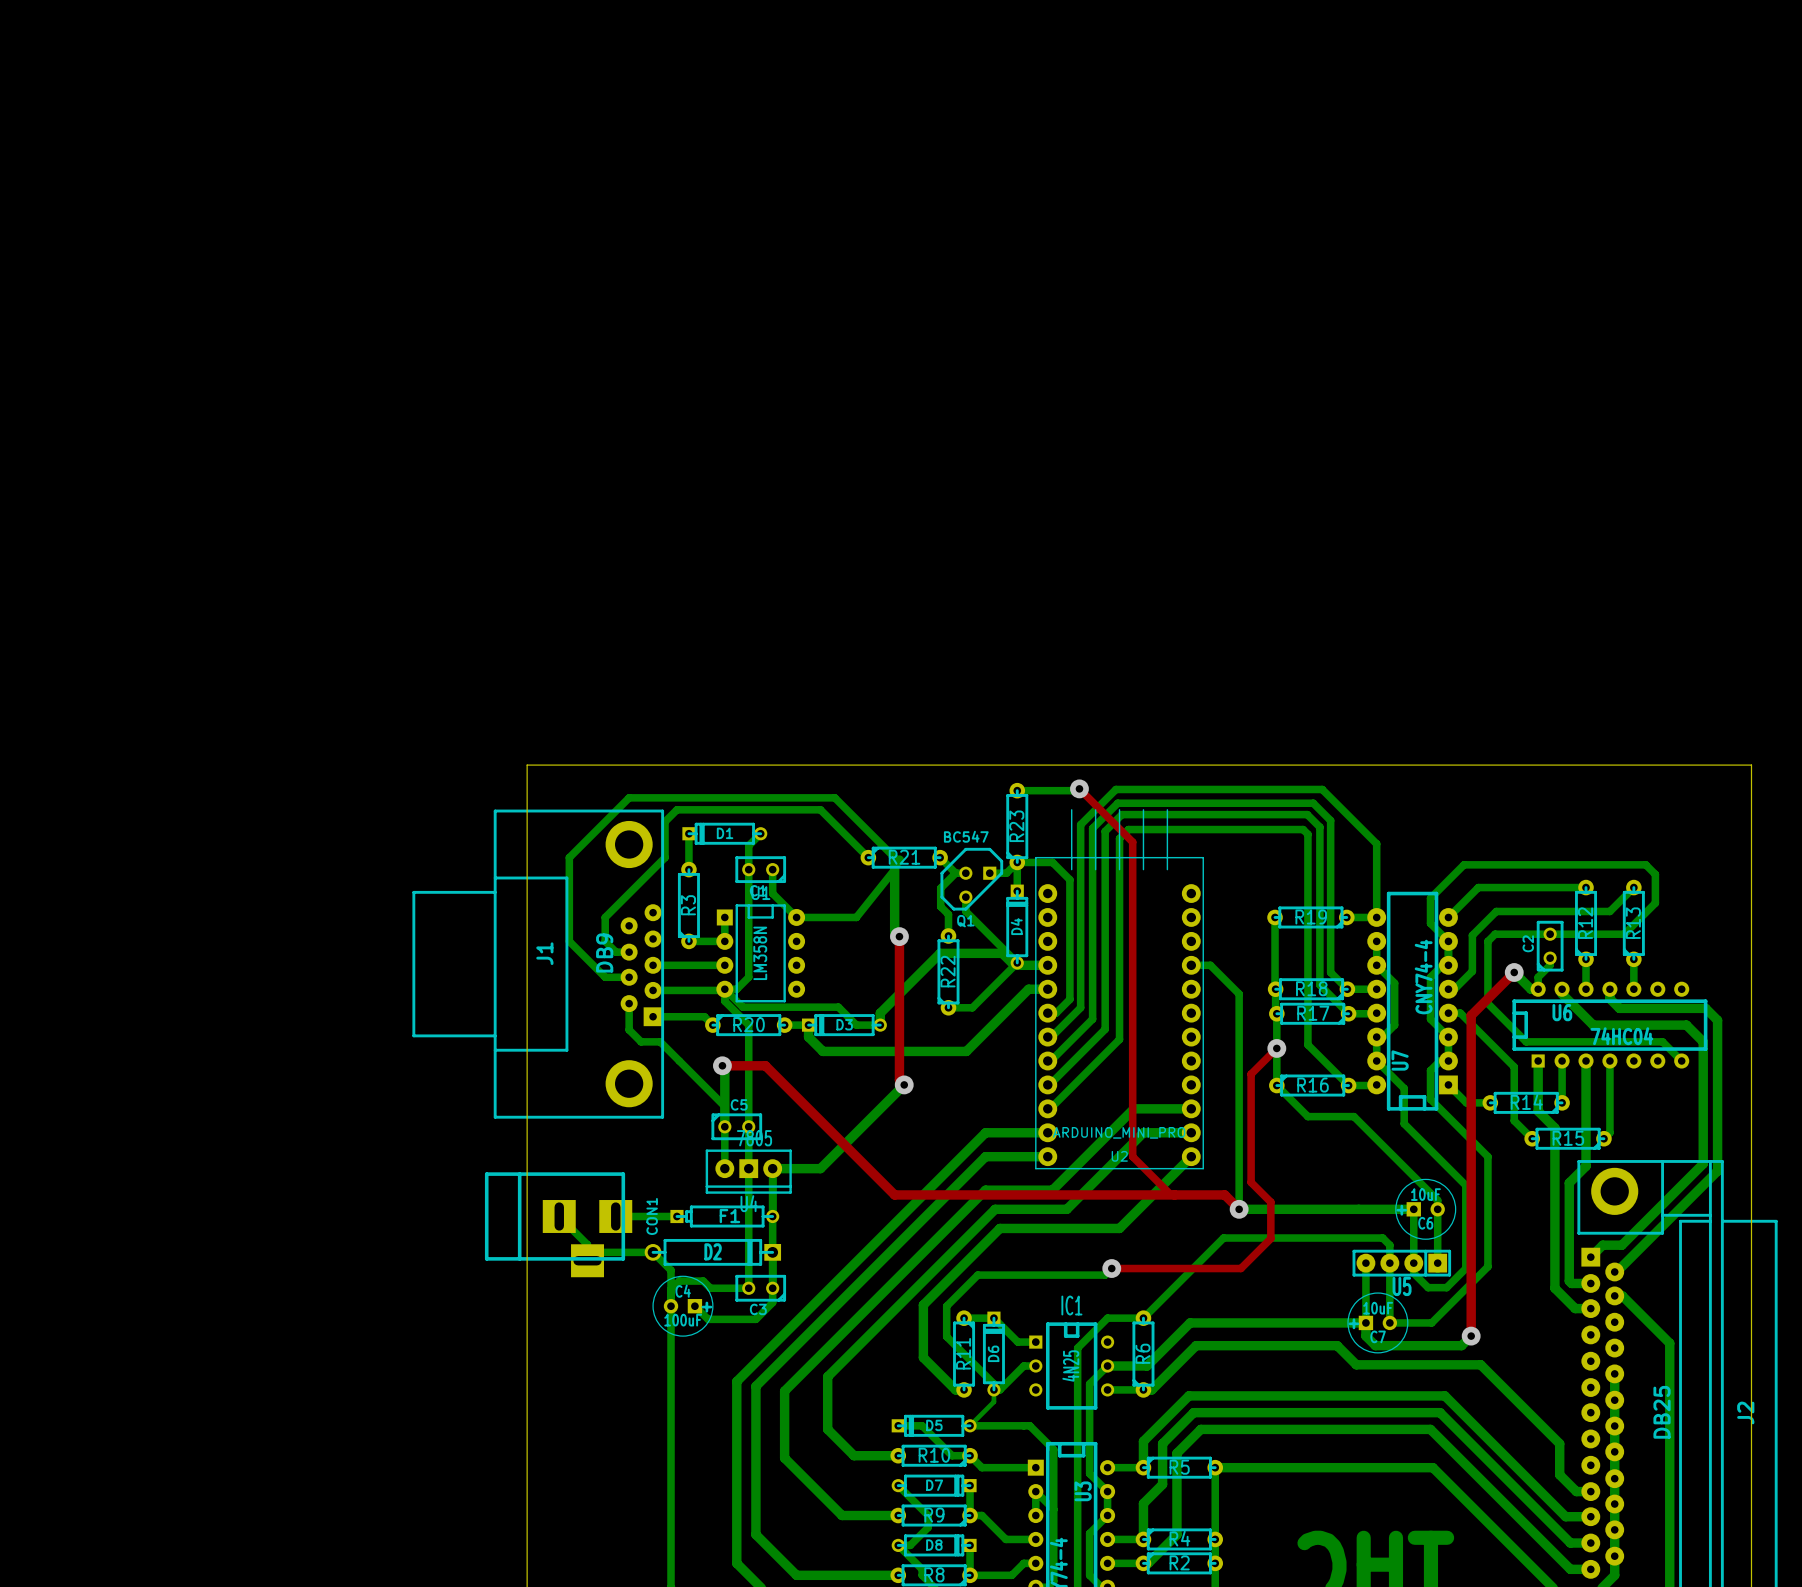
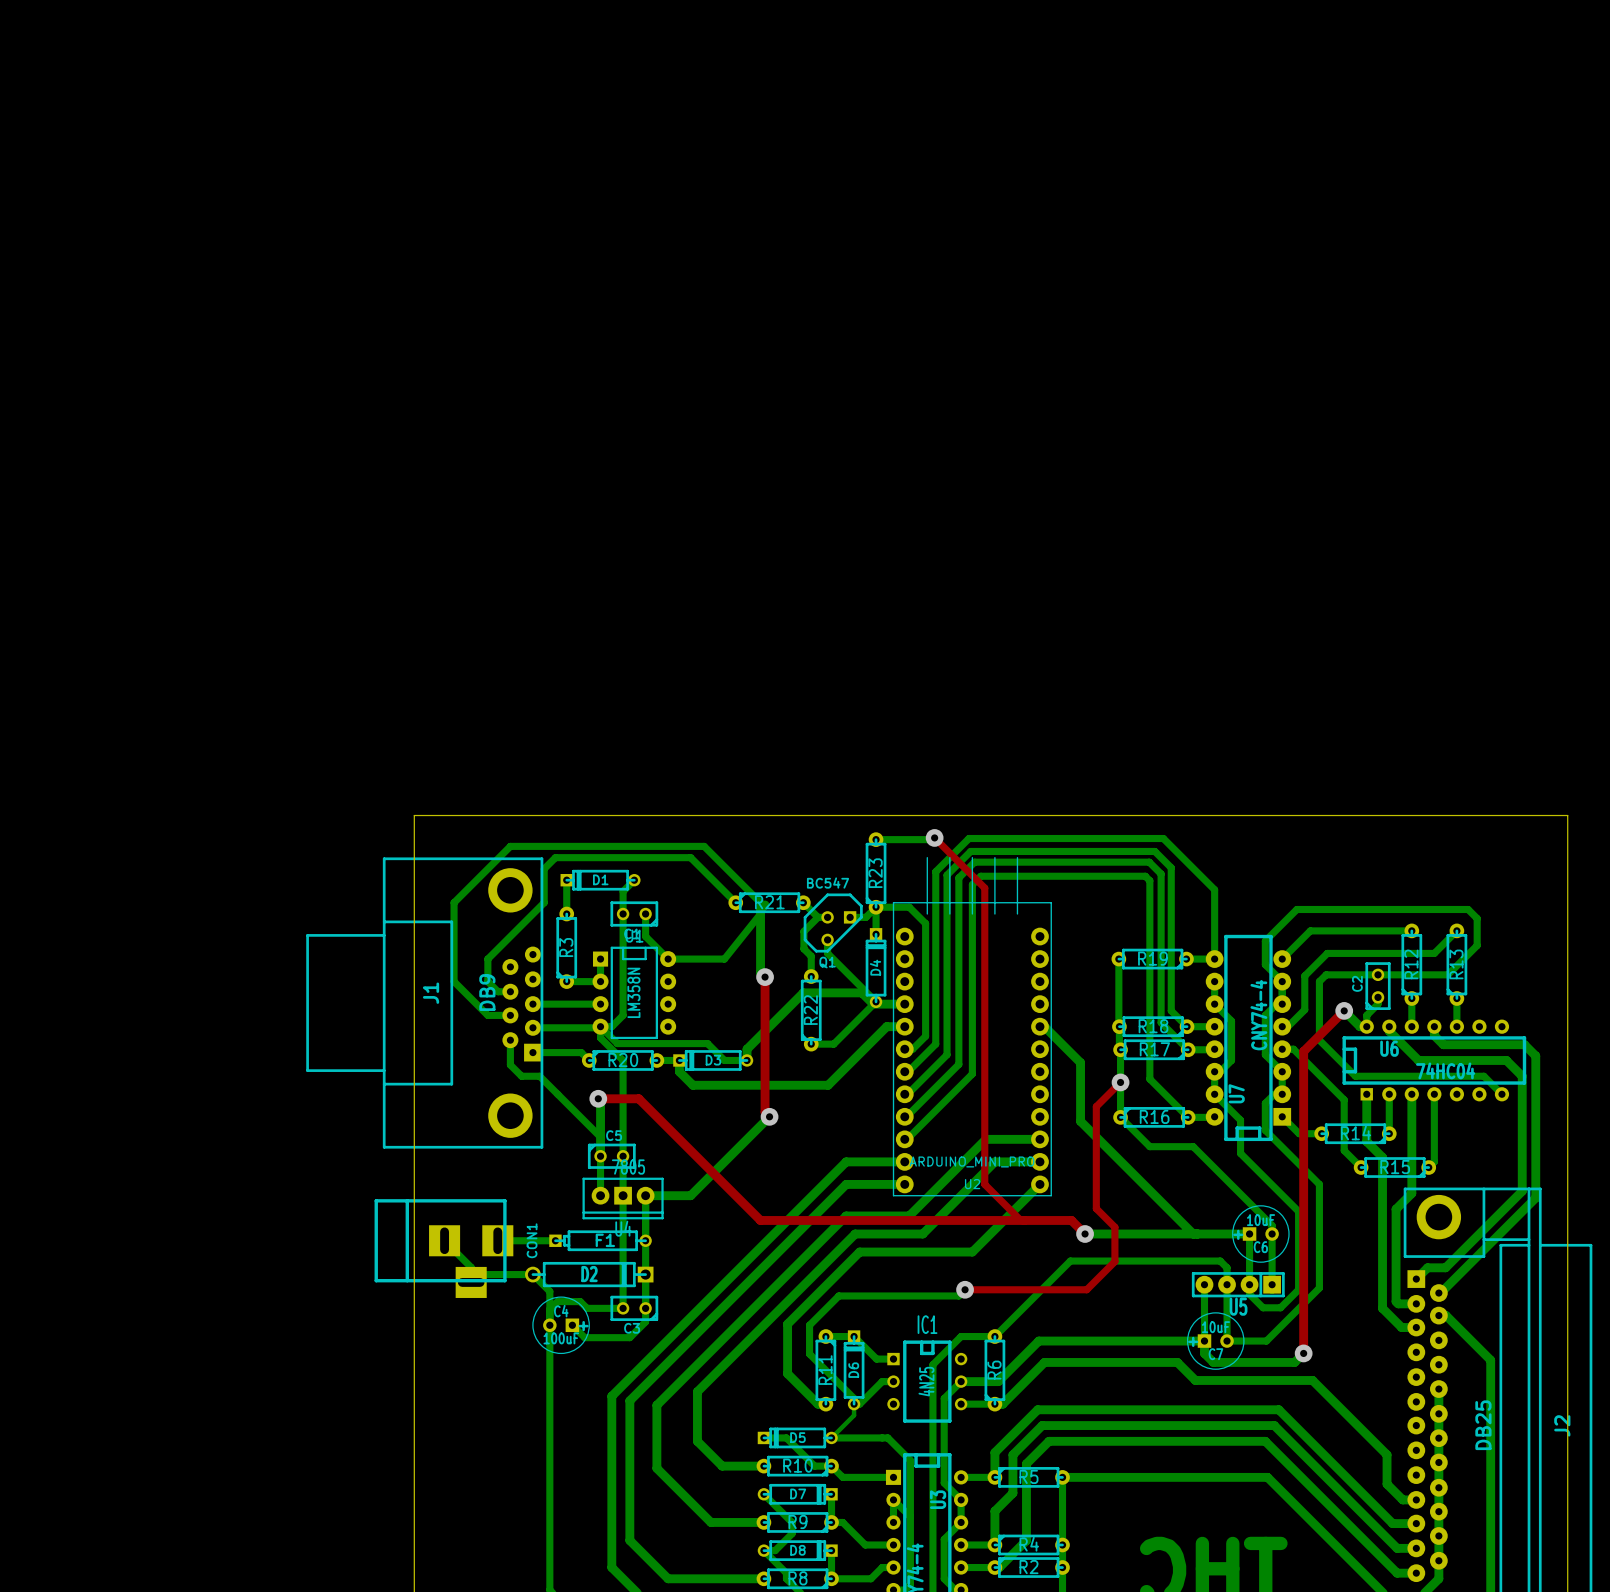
bottom track: (1191, 965) (1210, 965) (1239, 994) (1239, 1209) -> none
bottom track: none -> (1039, 1026) (1044, 1026) (1080, 1062) (1080, 1121) (1193, 1234)

